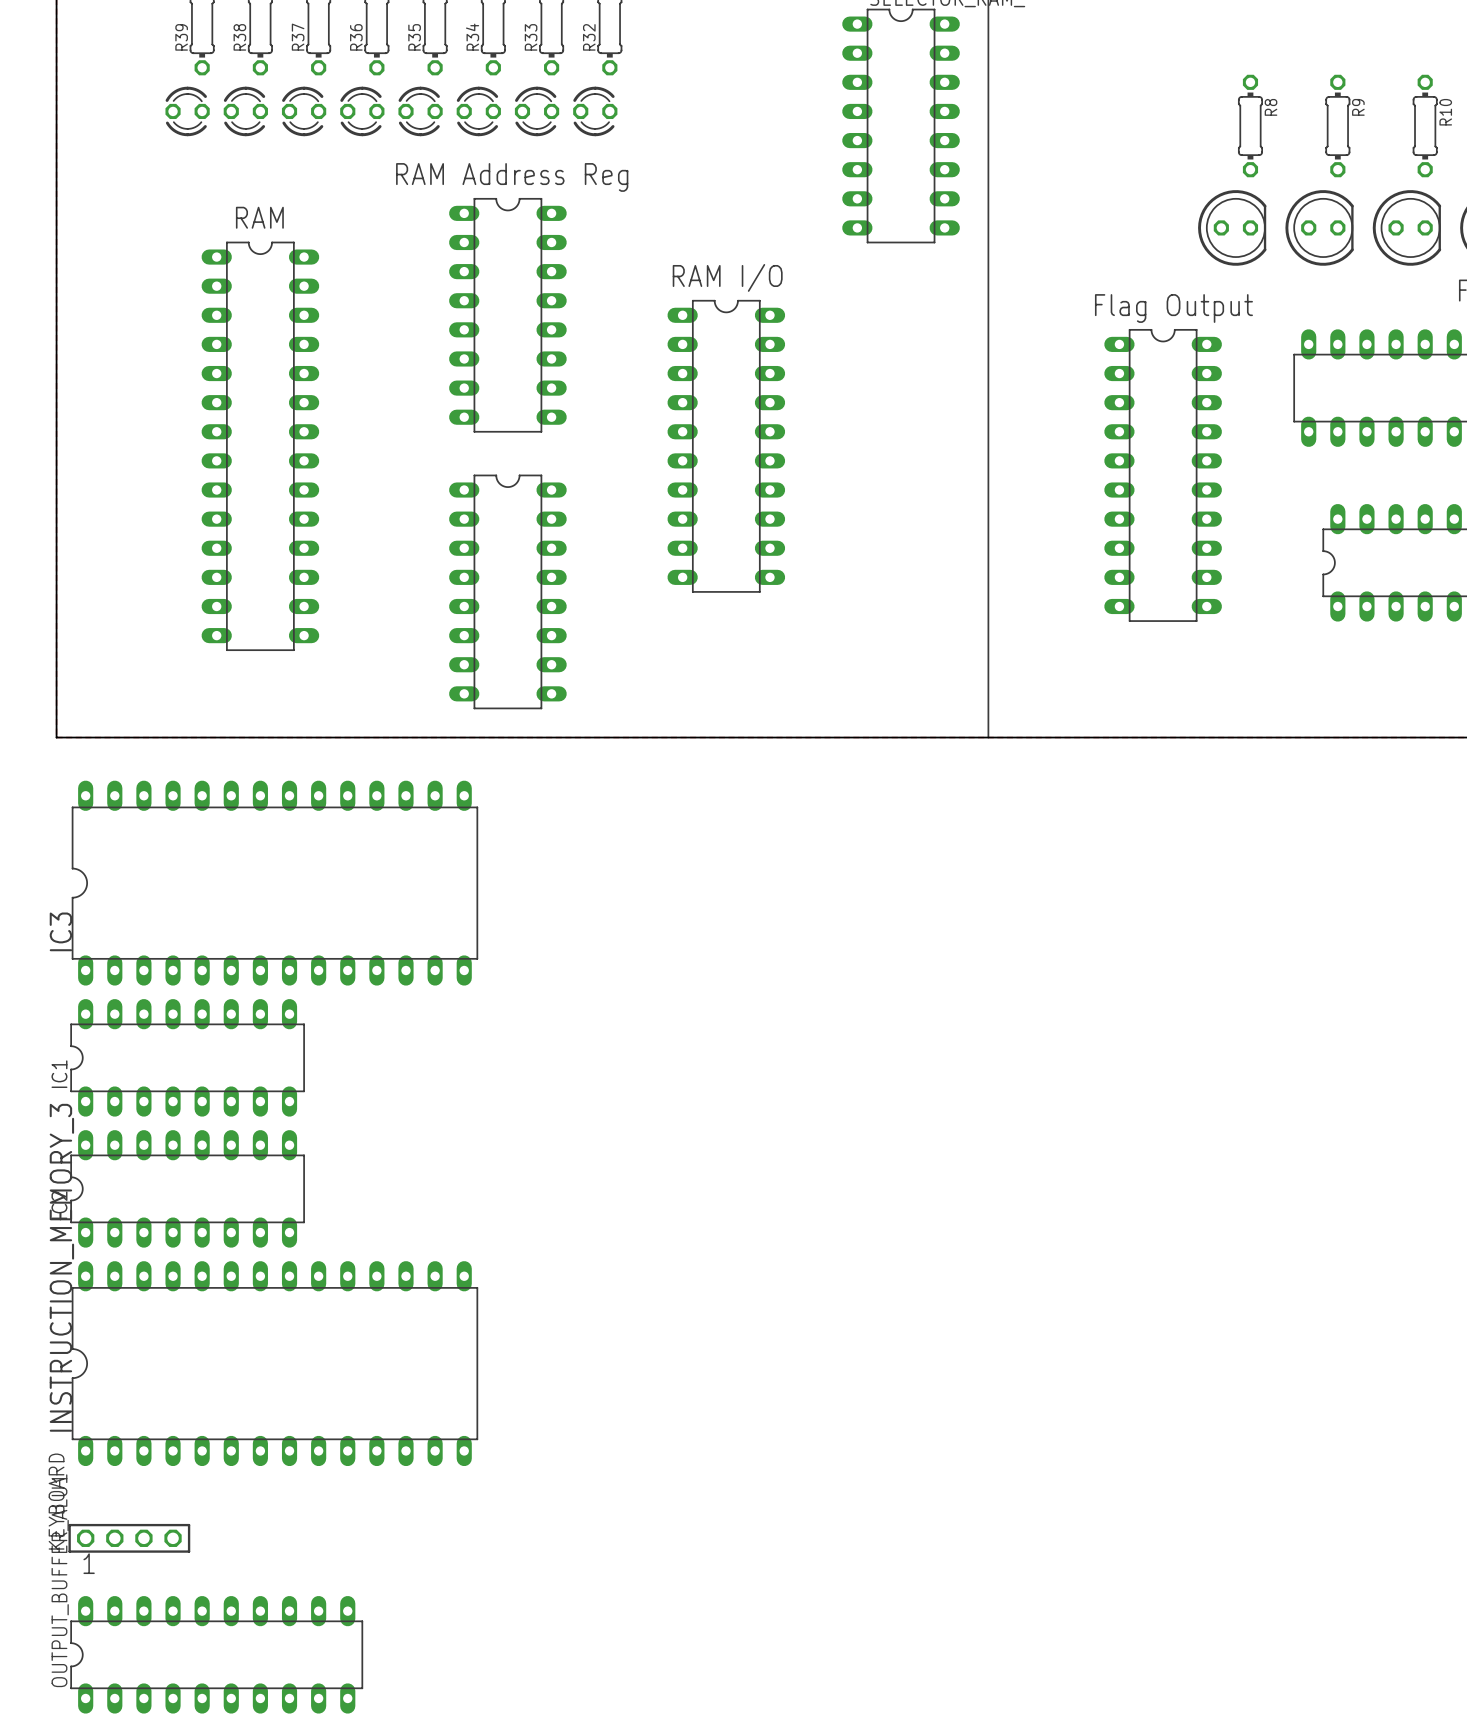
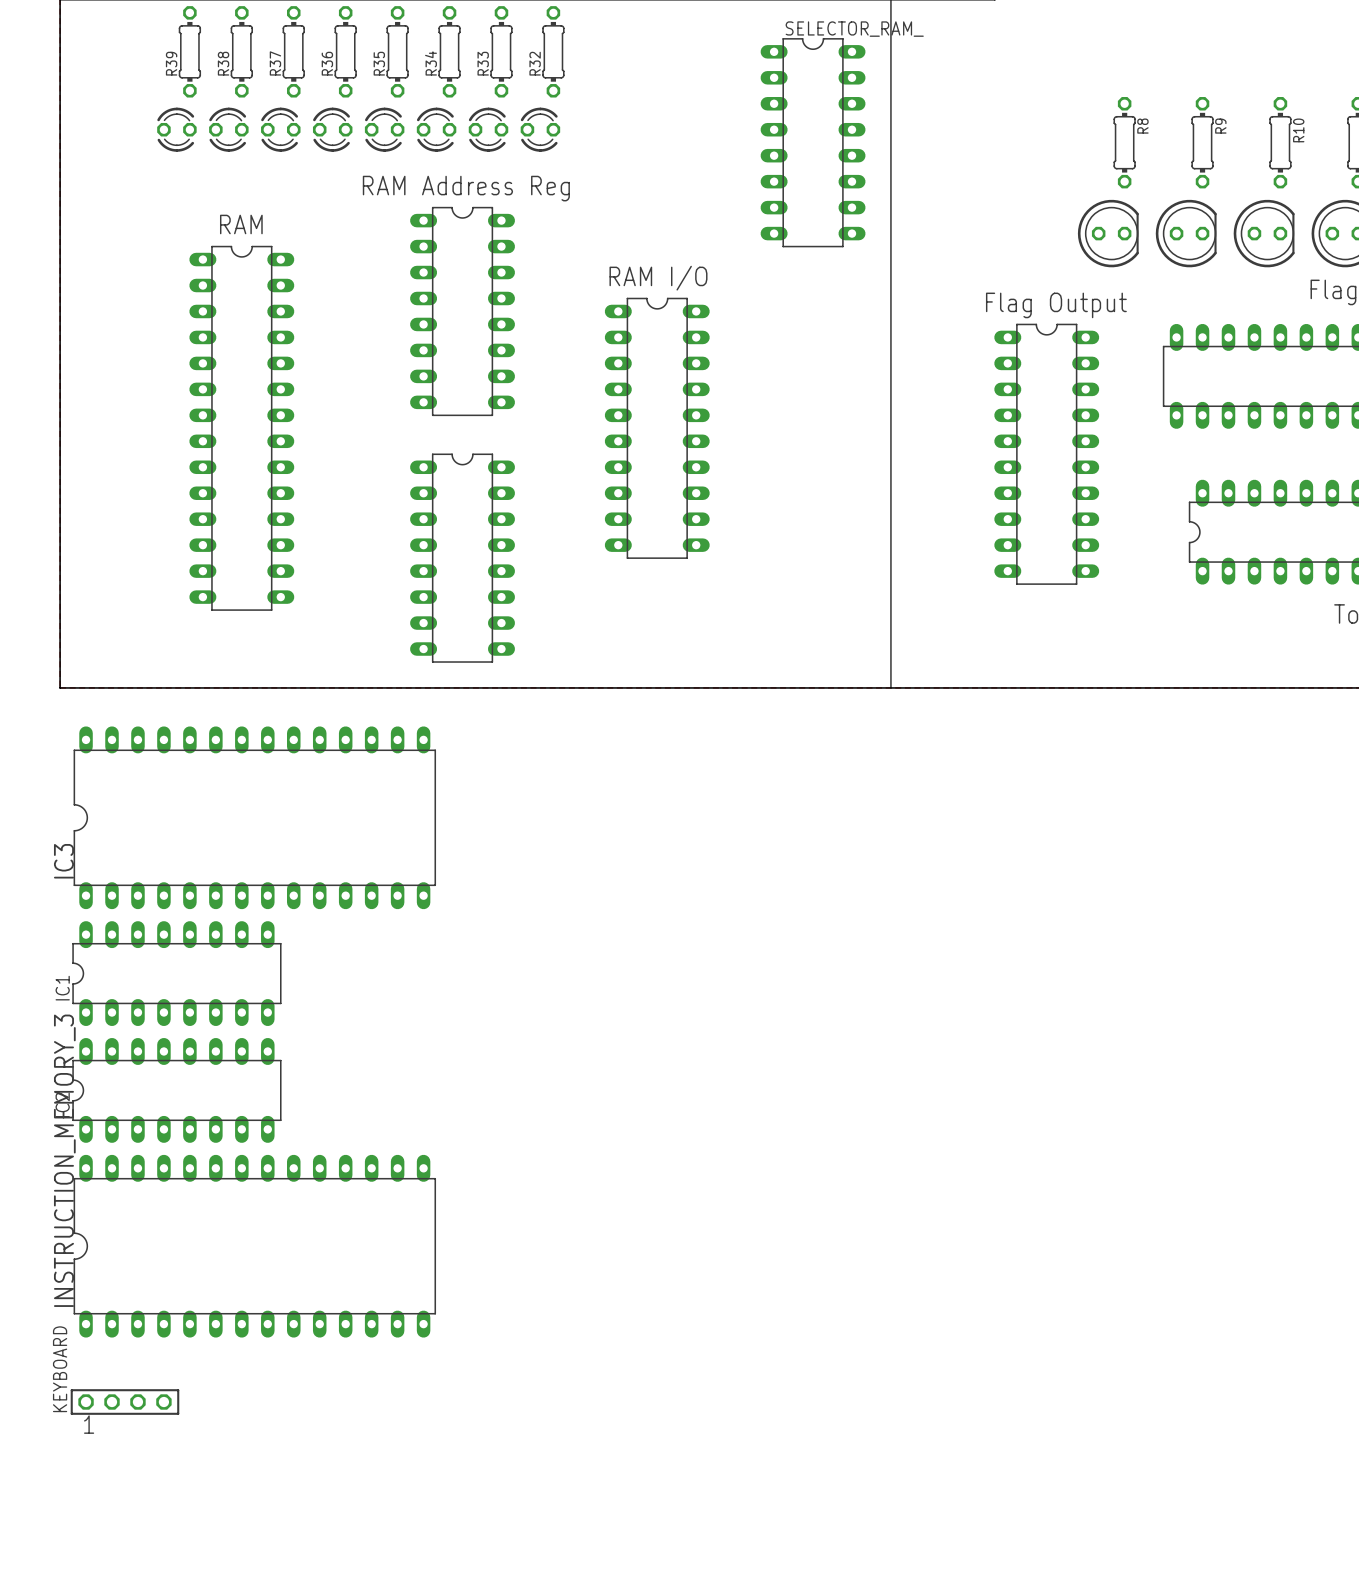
OUTPUT_BUFFER_ALU1: (216, 1654) -> none

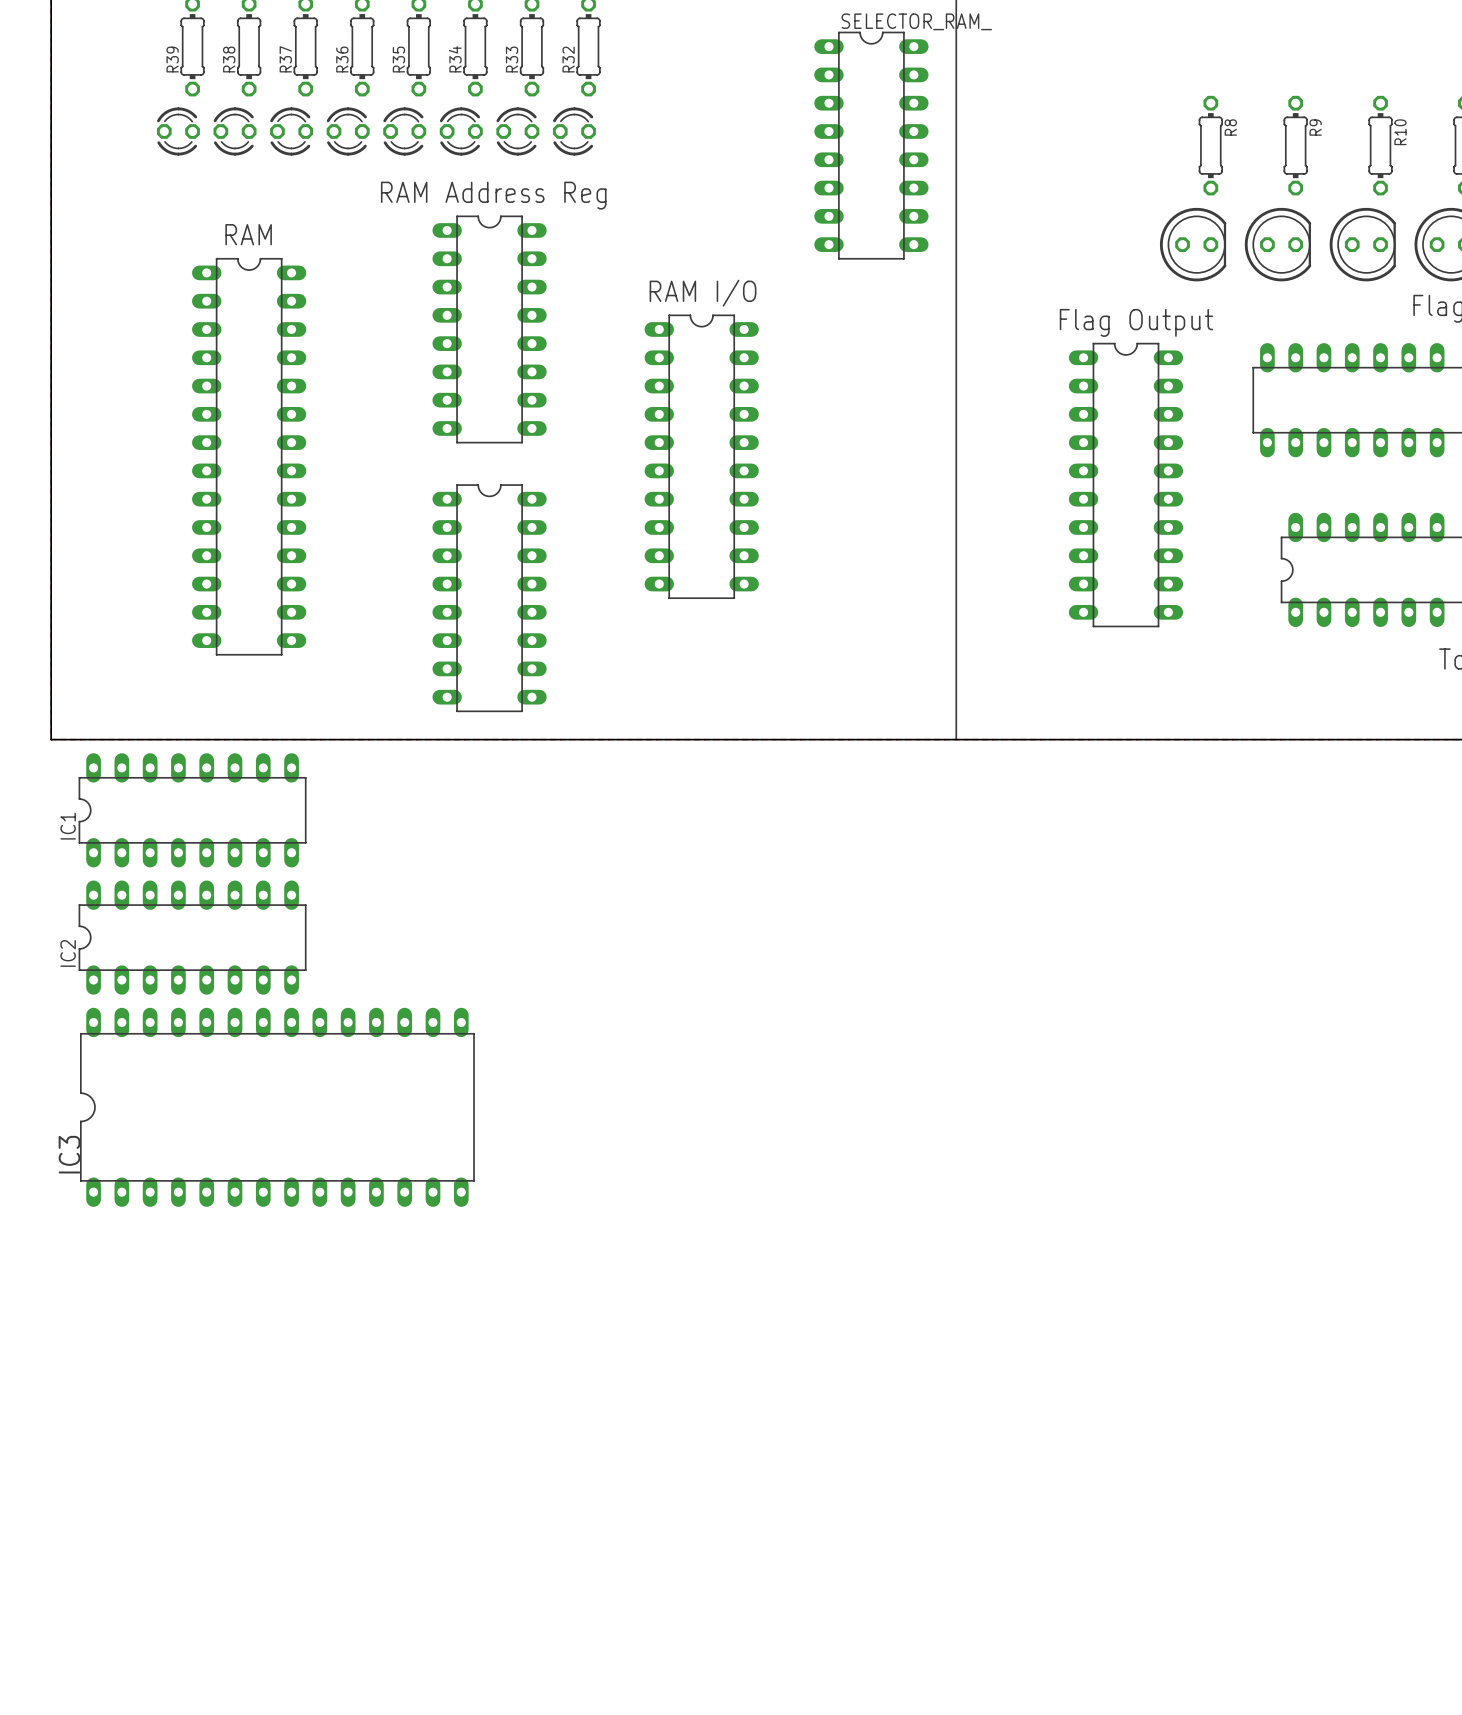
IC3 position: (254, 817) -> (277, 1107)
IC1 position: (176, 973) -> (192, 810)
IC2 position: (176, 1090) -> (192, 937)
INSTRUCTION_MEMORY_3: (254, 1246) -> none
KEYBOARD: (124, 1402) -> none

